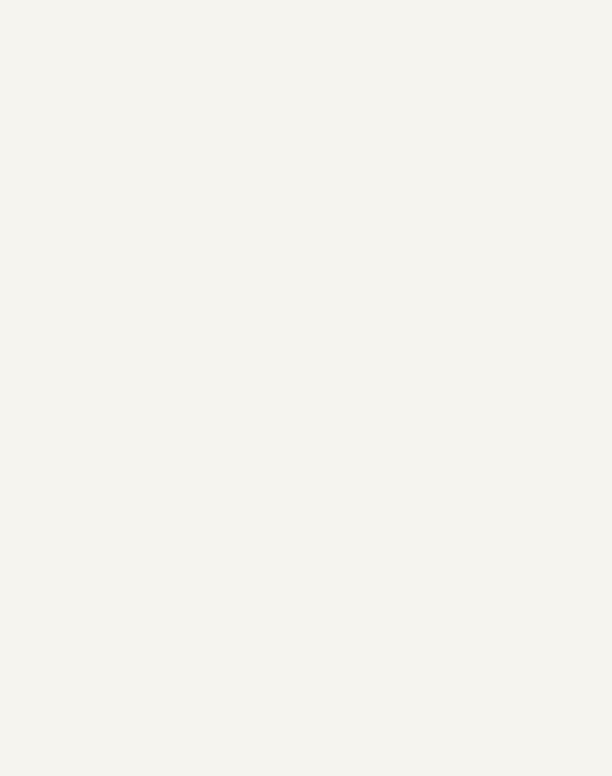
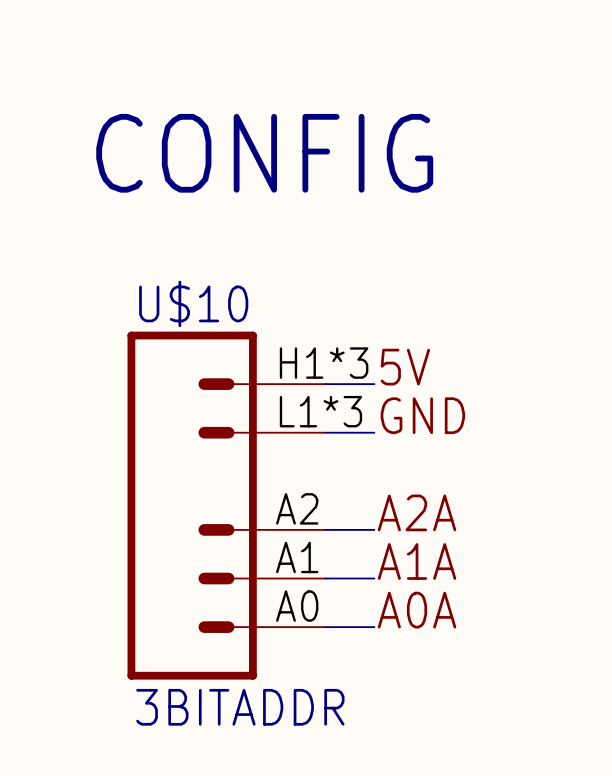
text: none -> CONFIG (264, 153)
label: none -> 5V (405, 367)
wire: none -> (325, 384) (374, 384)
label: none -> GND (422, 415)
wire: none -> (325, 432) (374, 432)
U$10: none -> 3BITADDR (226, 505)
label: none -> A2A (417, 512)
wire: none -> (325, 529) (374, 529)
label: none -> A1A (417, 561)
wire: none -> (325, 578) (374, 578)
label: none -> A0A (417, 610)
wire: none -> (325, 627) (374, 627)

